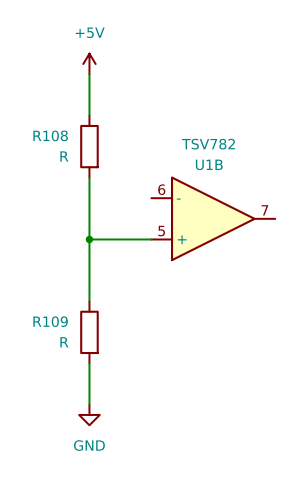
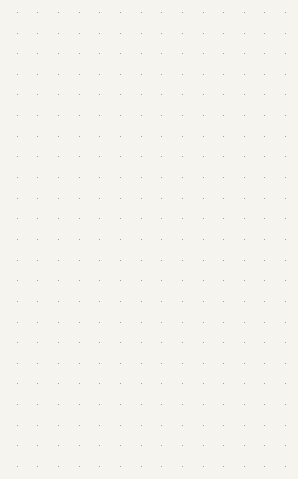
power symbol: +5V (89, 64) -> none
wire: (89, 74) (89, 115) -> none
R108: R (89, 146) -> none
wire: (89, 177) (89, 301) -> none
U1B: TSV782 (213, 218) -> none
wire: (89, 239) (151, 239) -> none
junction: (89, 239) -> none
R109: R (89, 332) -> none
wire: (89, 363) (89, 404) -> none
power symbol: GND (89, 414) -> none

